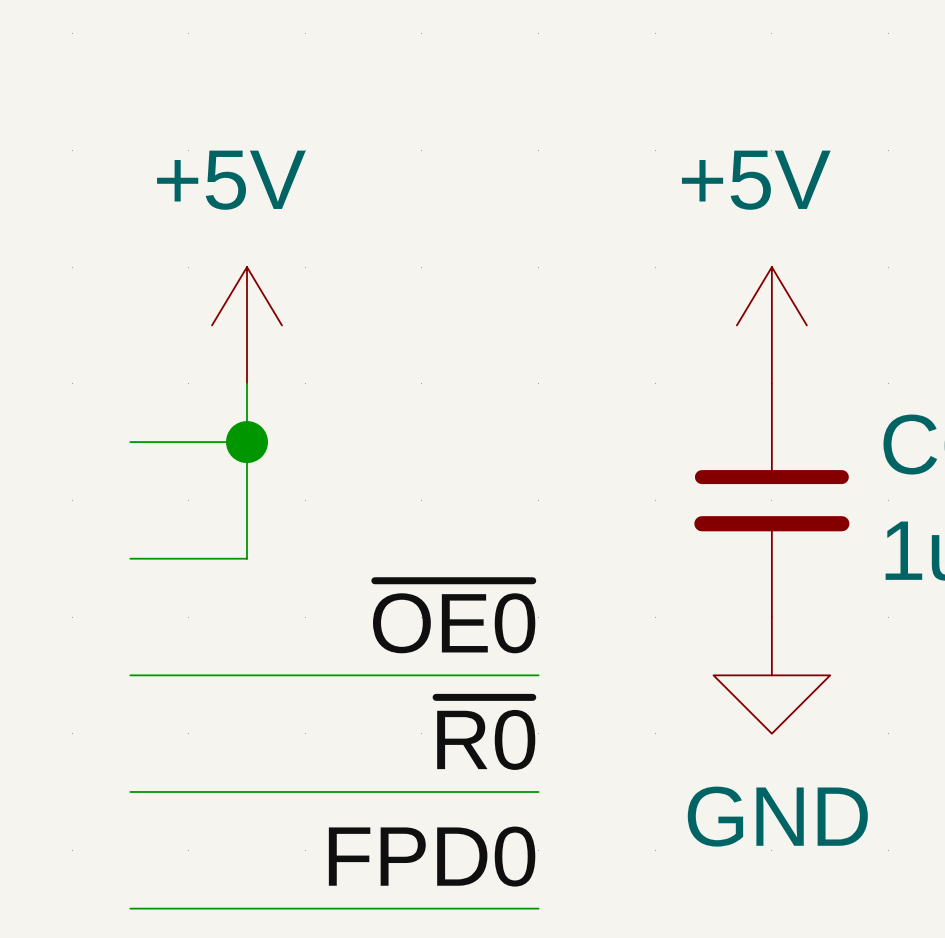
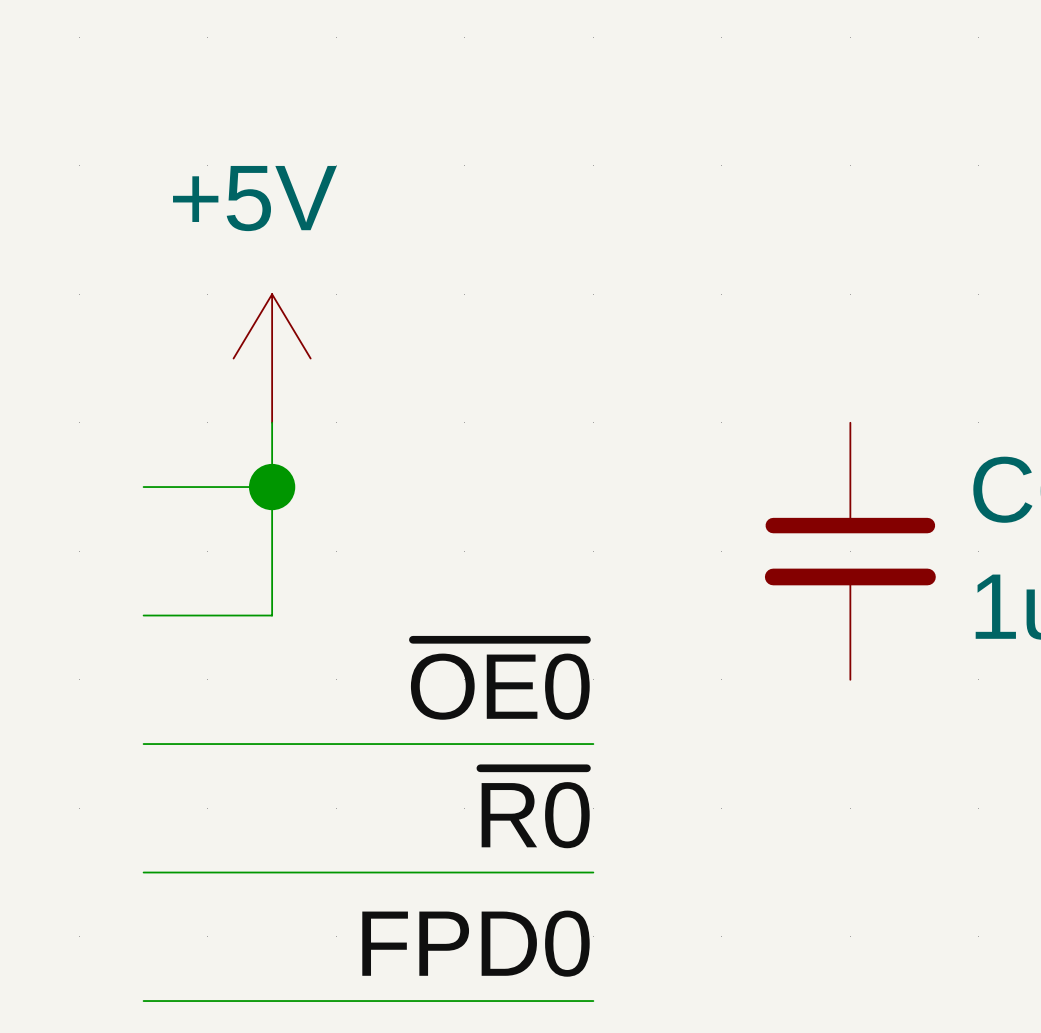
power symbol: +5V (771, 325) -> none
power symbol: GND (771, 675) -> none

